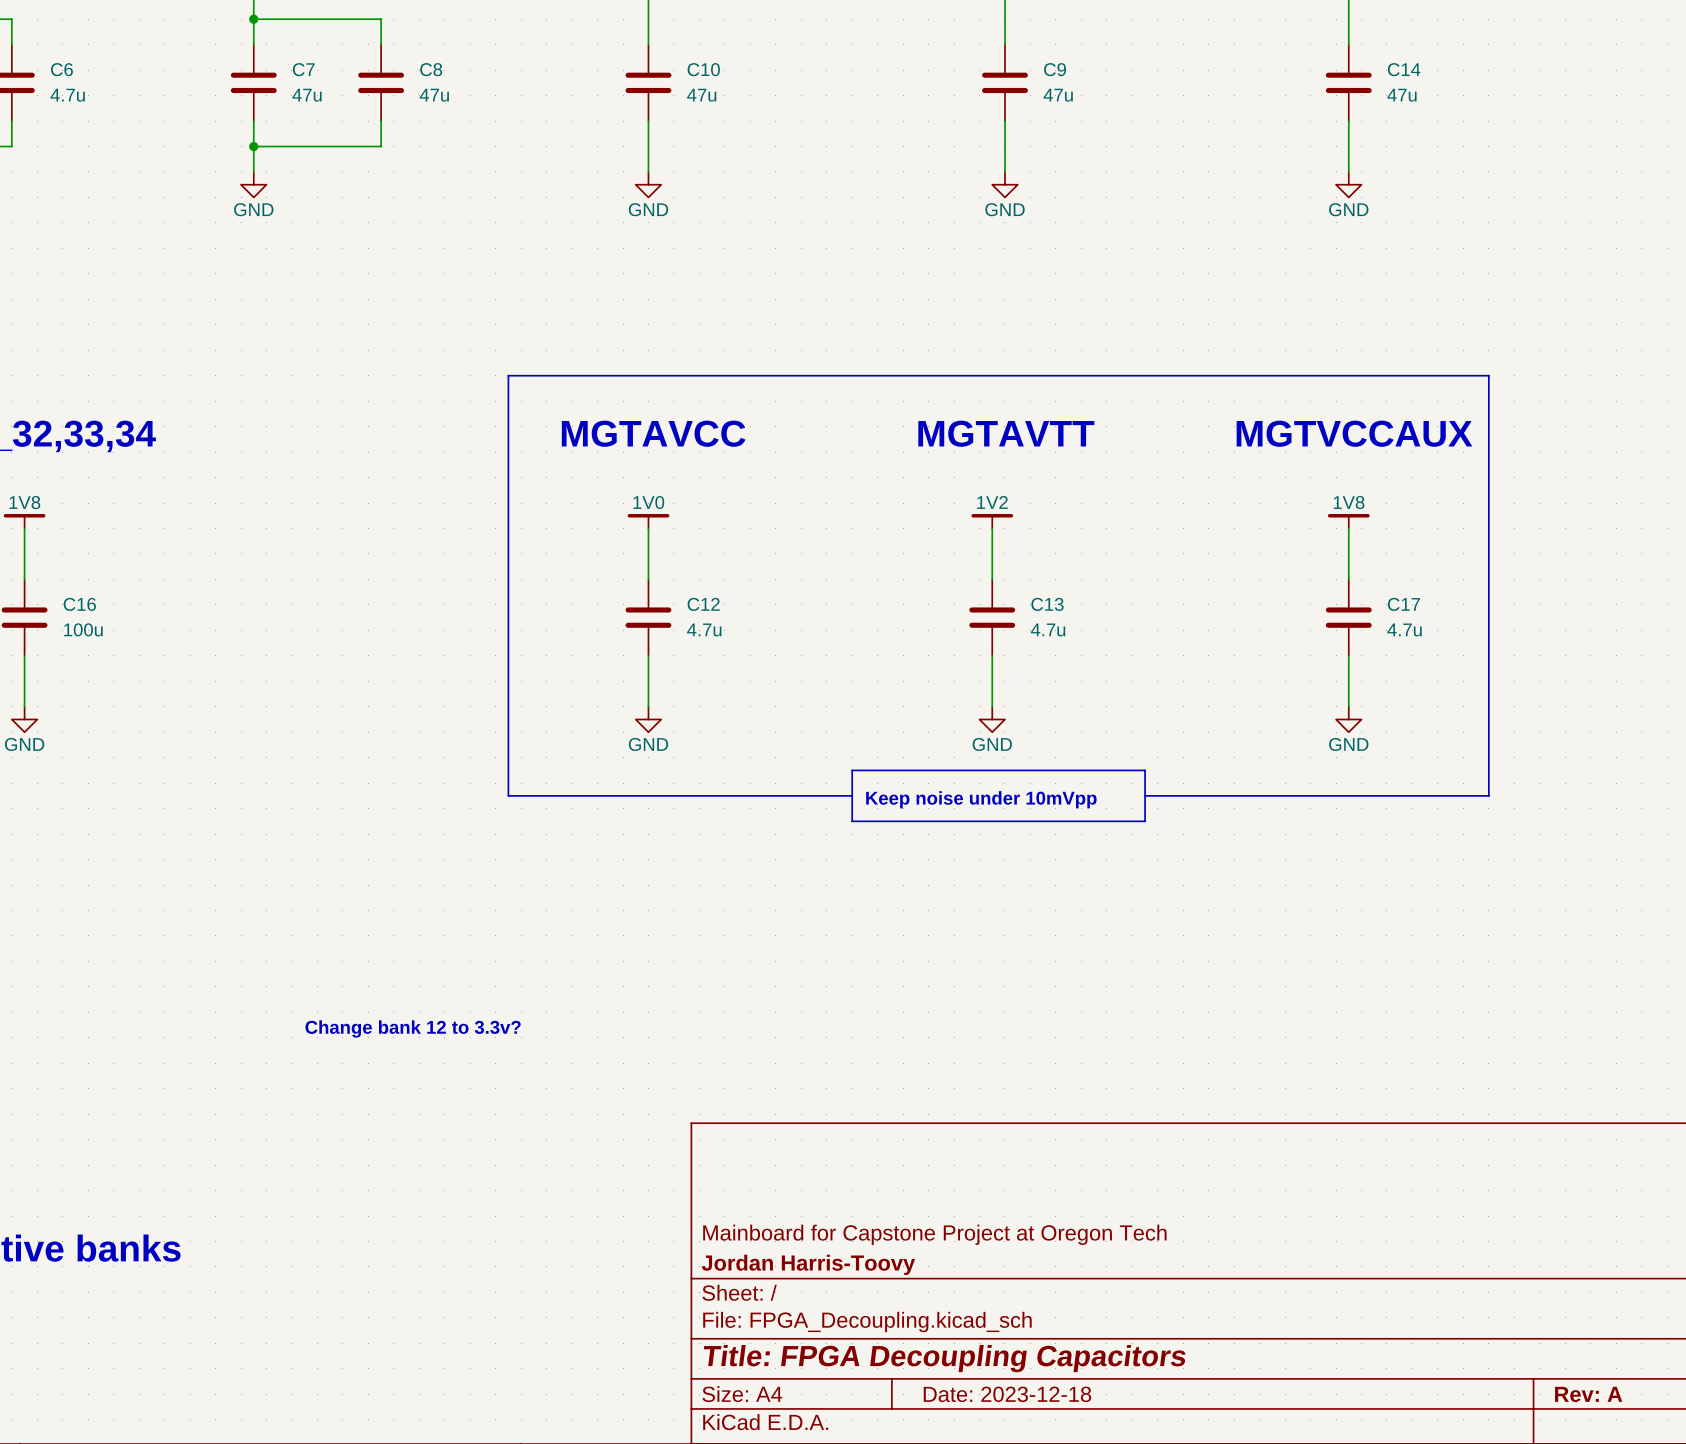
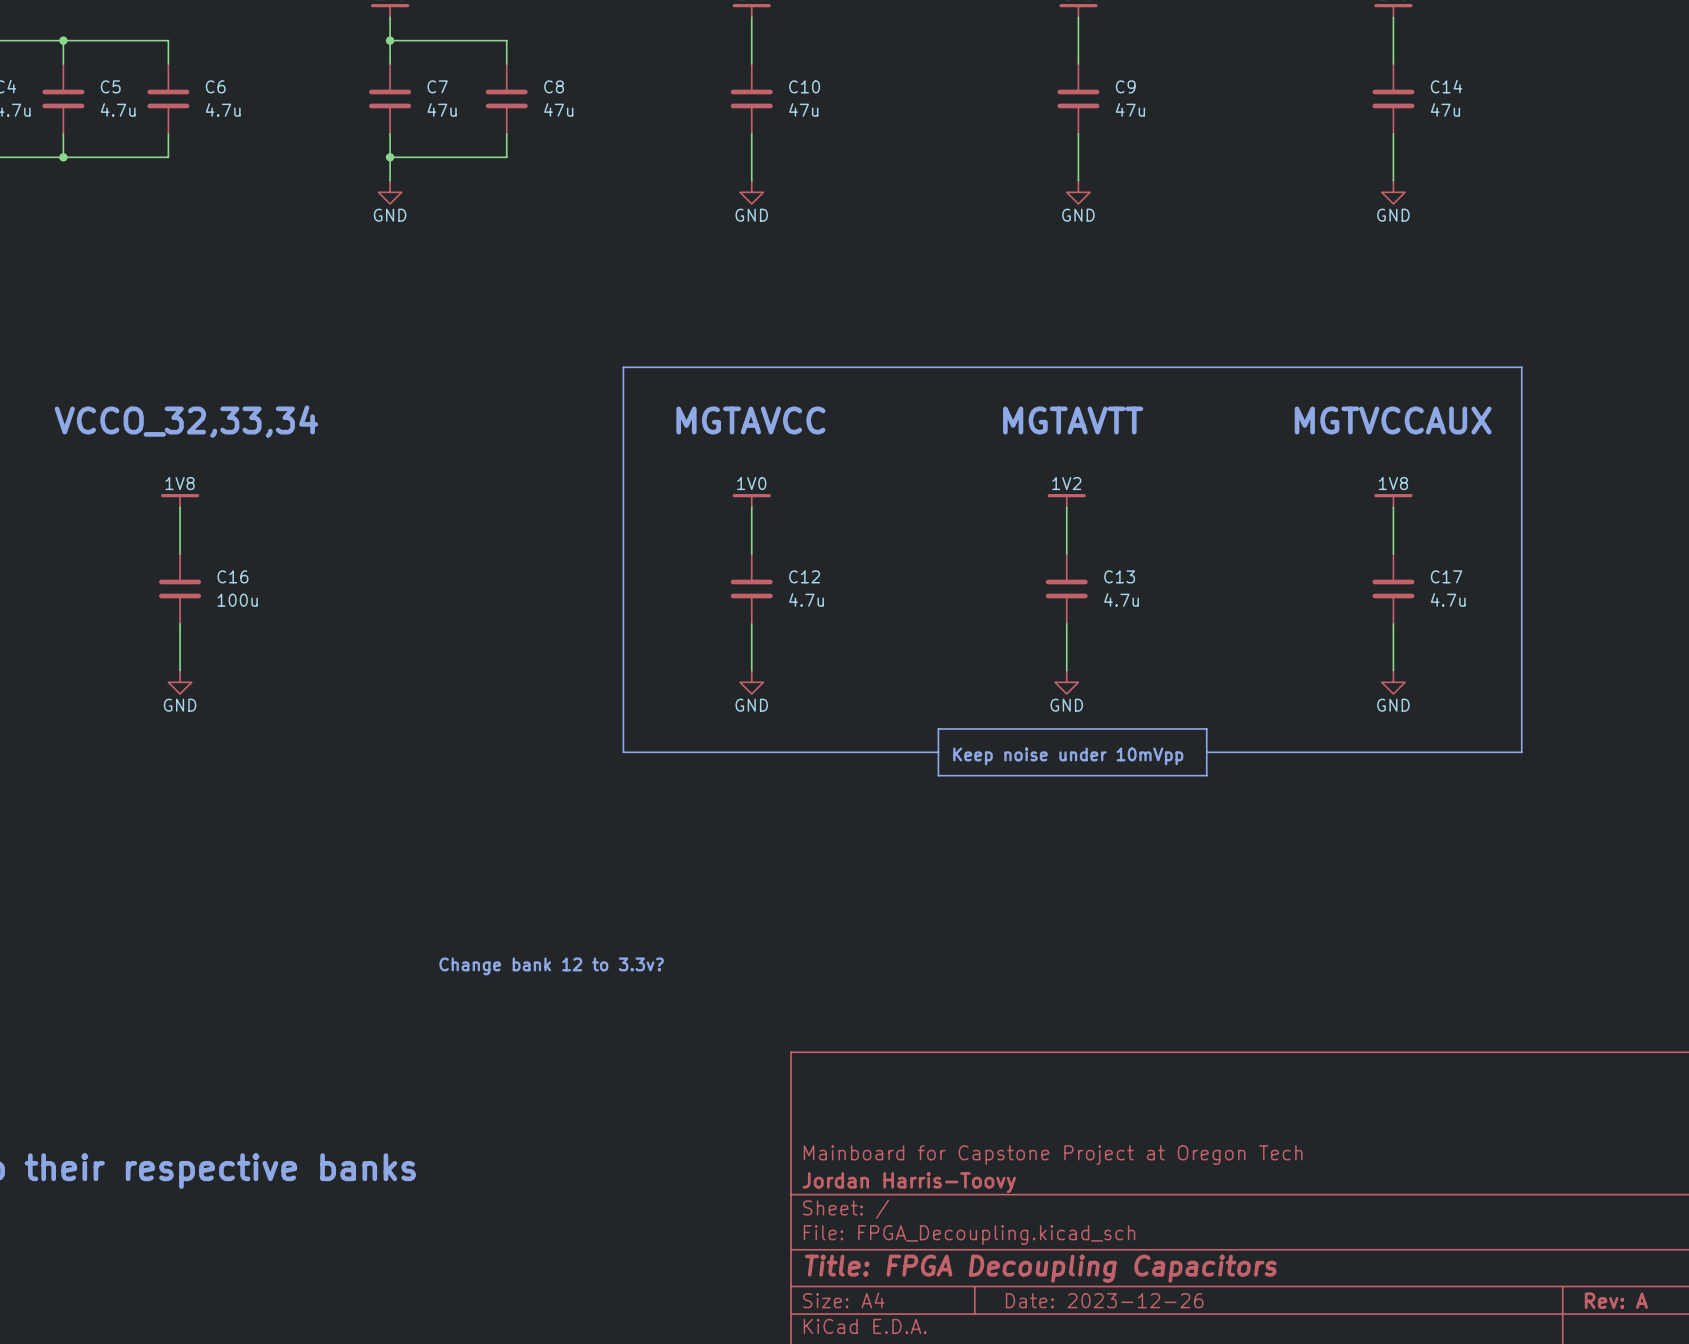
title block: Date: 2023-12-18 (1007, 1394) -> Date: 2023-12-26 (1104, 1300)

